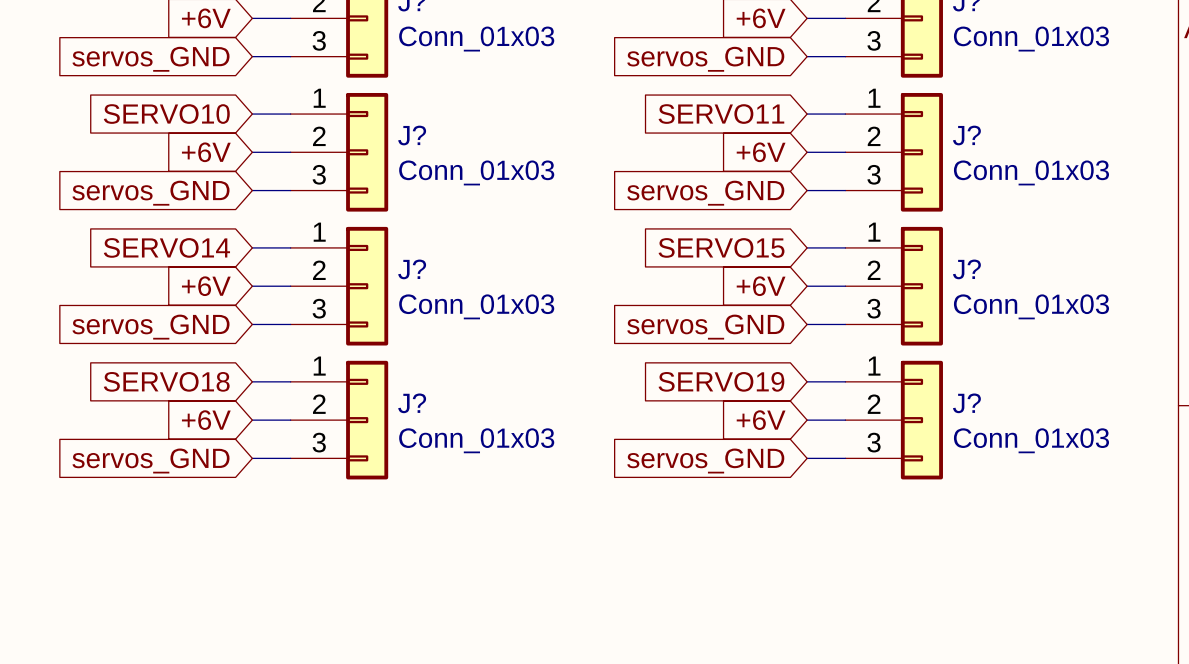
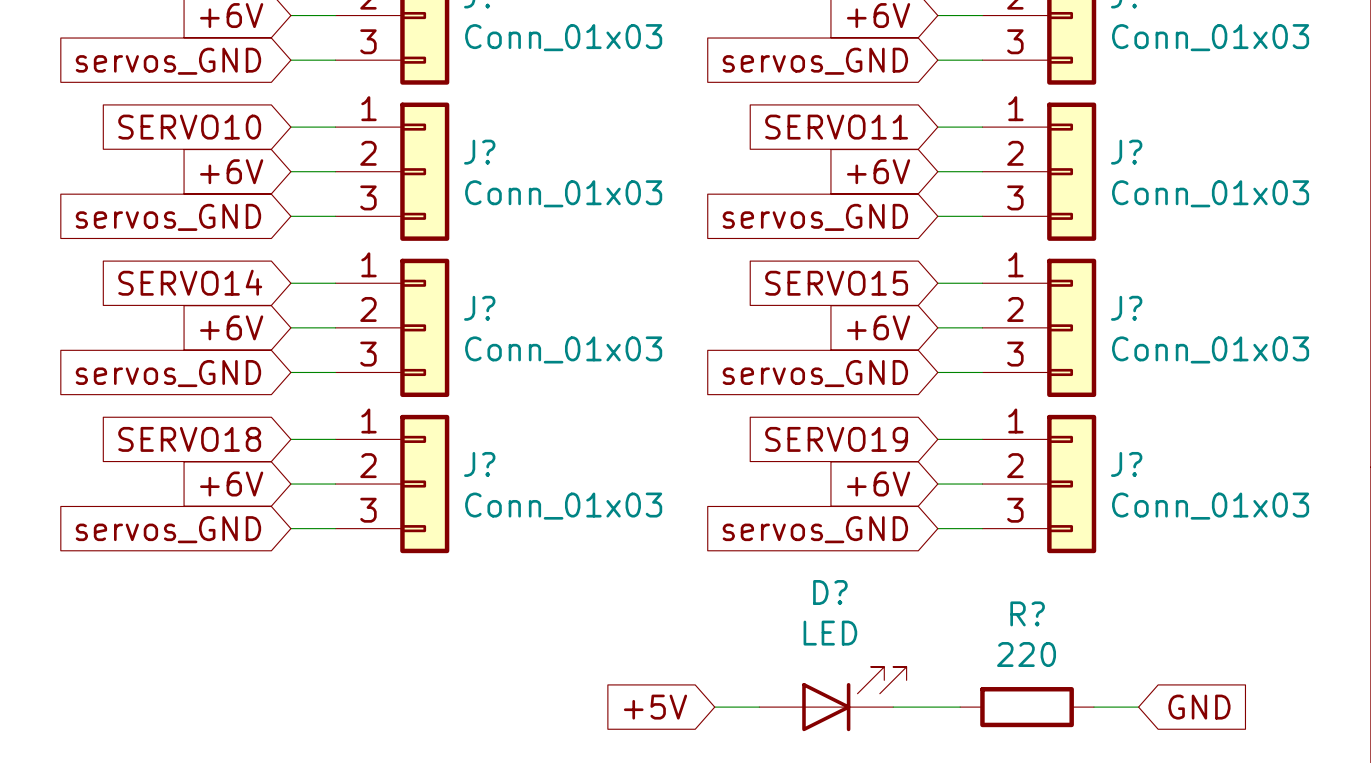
D?: none -> LED (832, 699)
global label: none -> +5V (655, 707)
wire: none -> (714, 707) (759, 707)
wire: none -> (893, 707) (960, 707)
R?: none -> 220 (1027, 707)
wire: none -> (1093, 707) (1138, 707)
global label: none -> GND (1199, 707)

